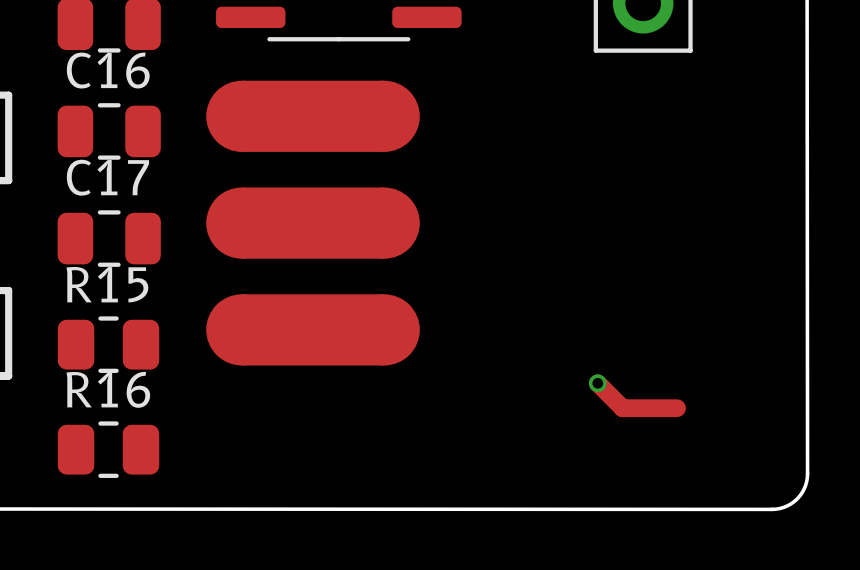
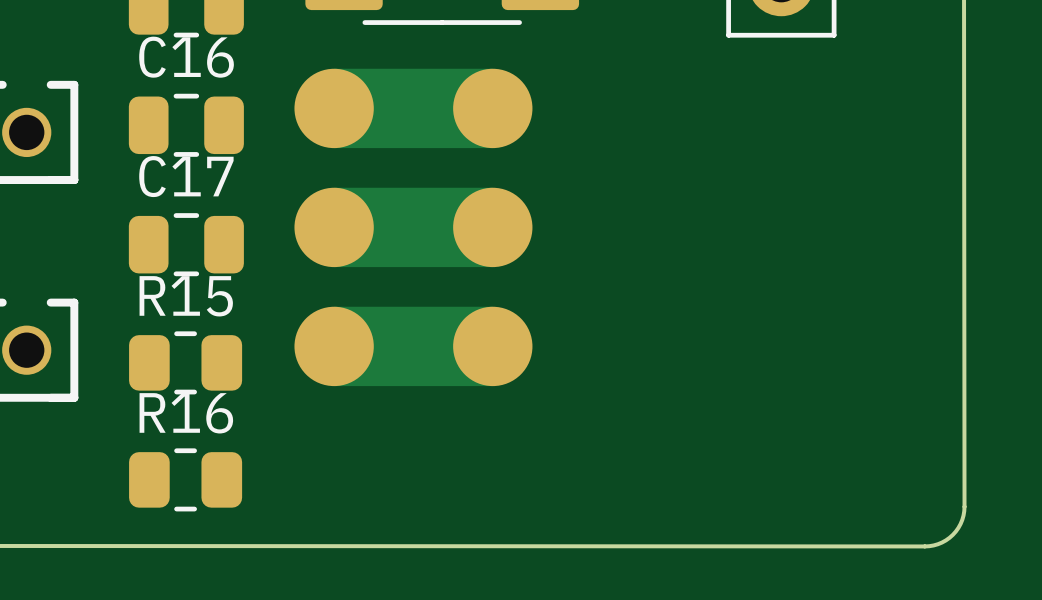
track: (597, 383) (622, 408) (677, 408) -> none
via: (597, 383) -> none

